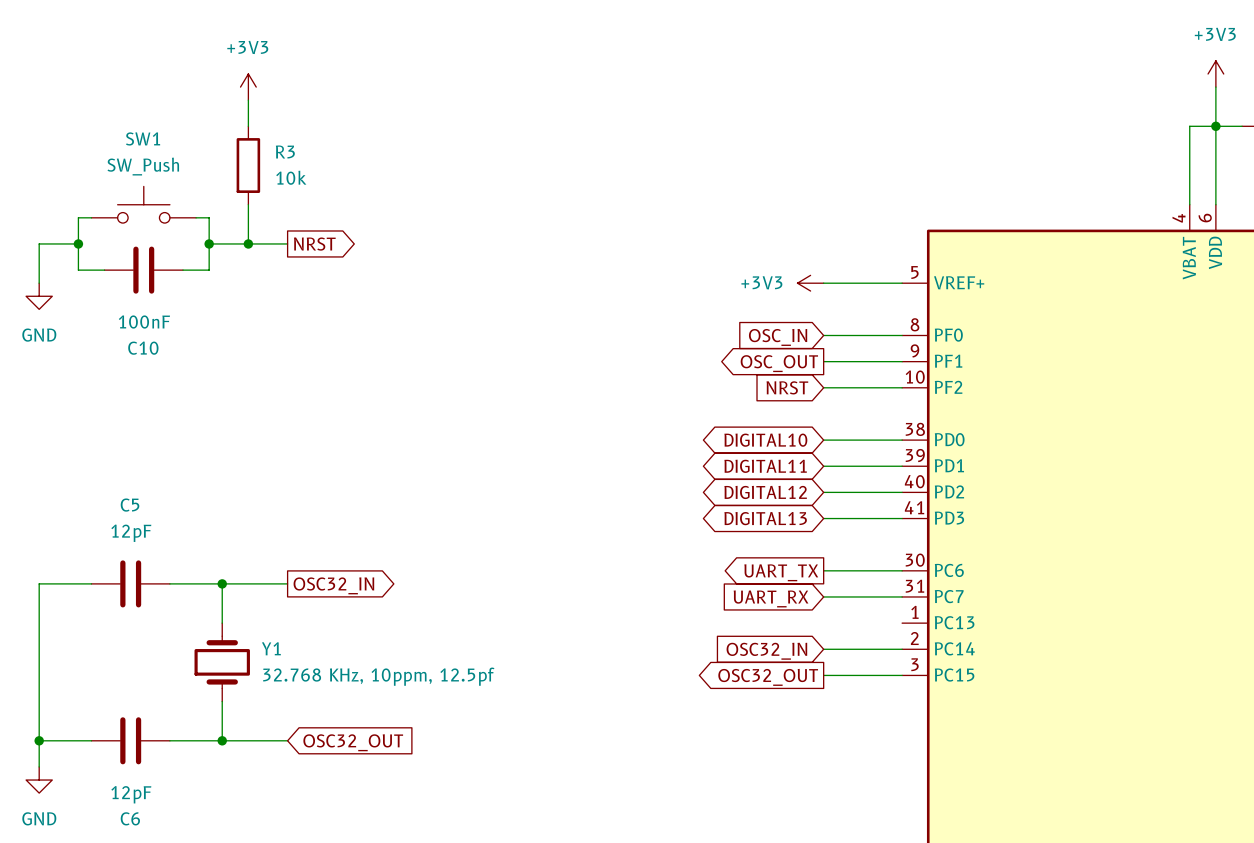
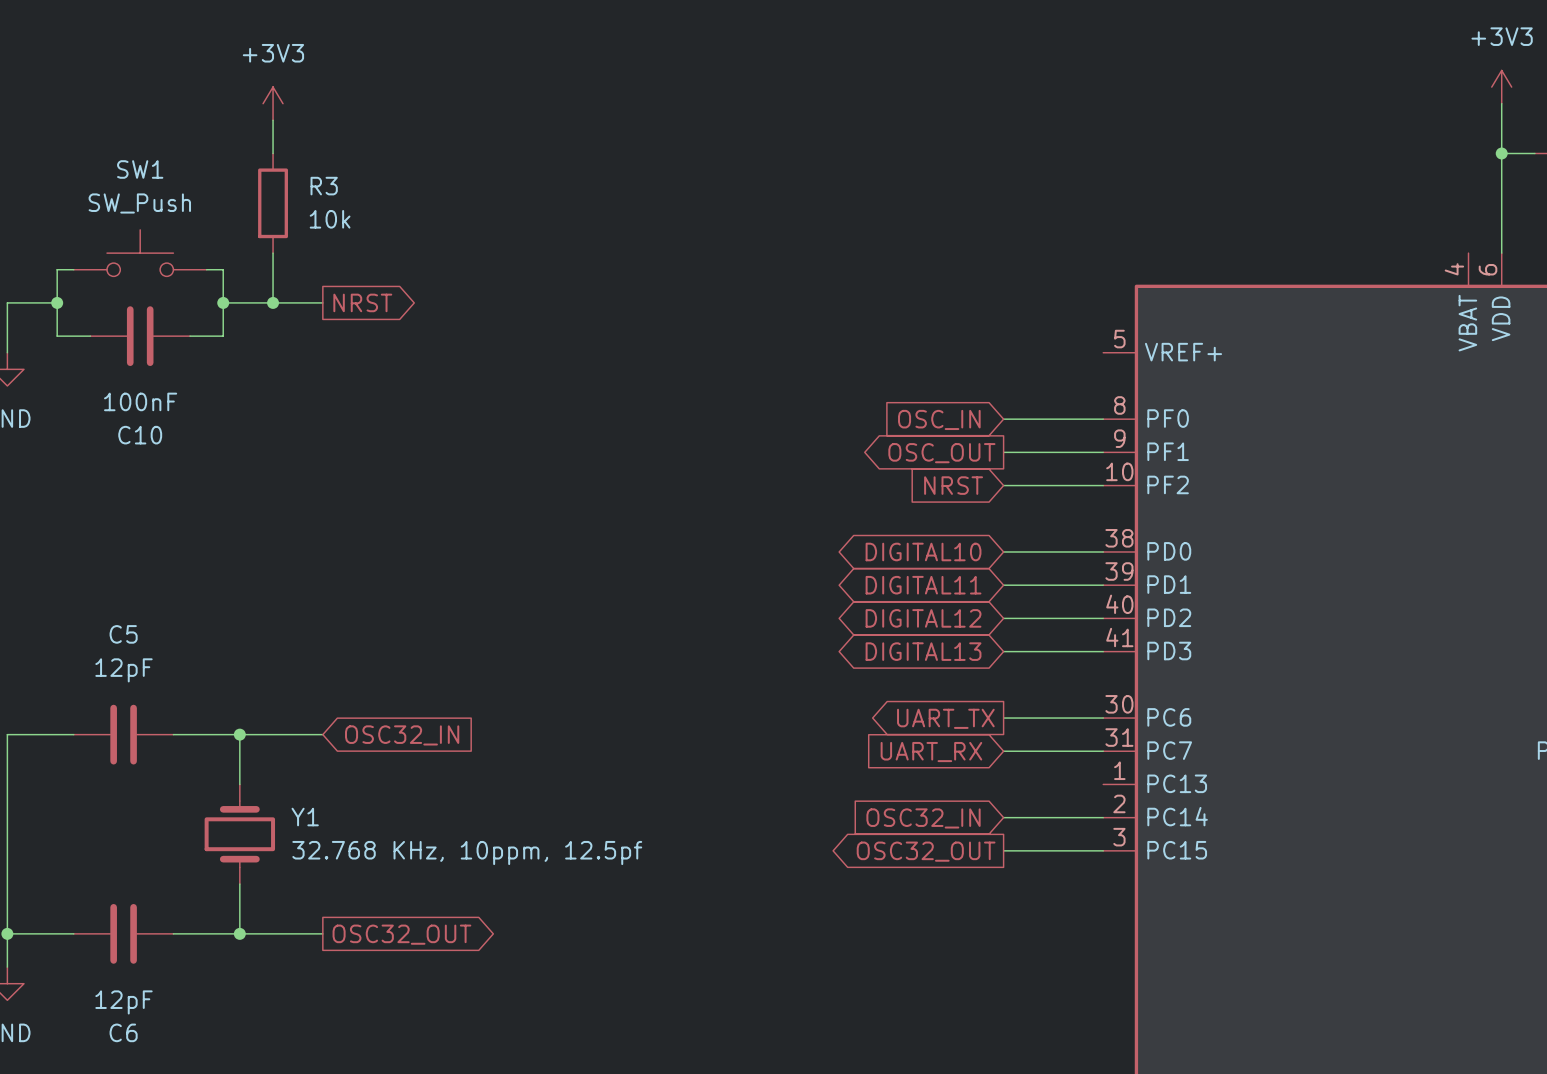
wire: (1215, 126) (1189, 126) (1189, 204) -> none
power symbol: +3V3 (810, 283) -> none
wire: (823, 283) (902, 283) -> none
global label shape: output (333, 585) -> input (402, 735)
global label shape: input (353, 742) -> output (401, 934)

